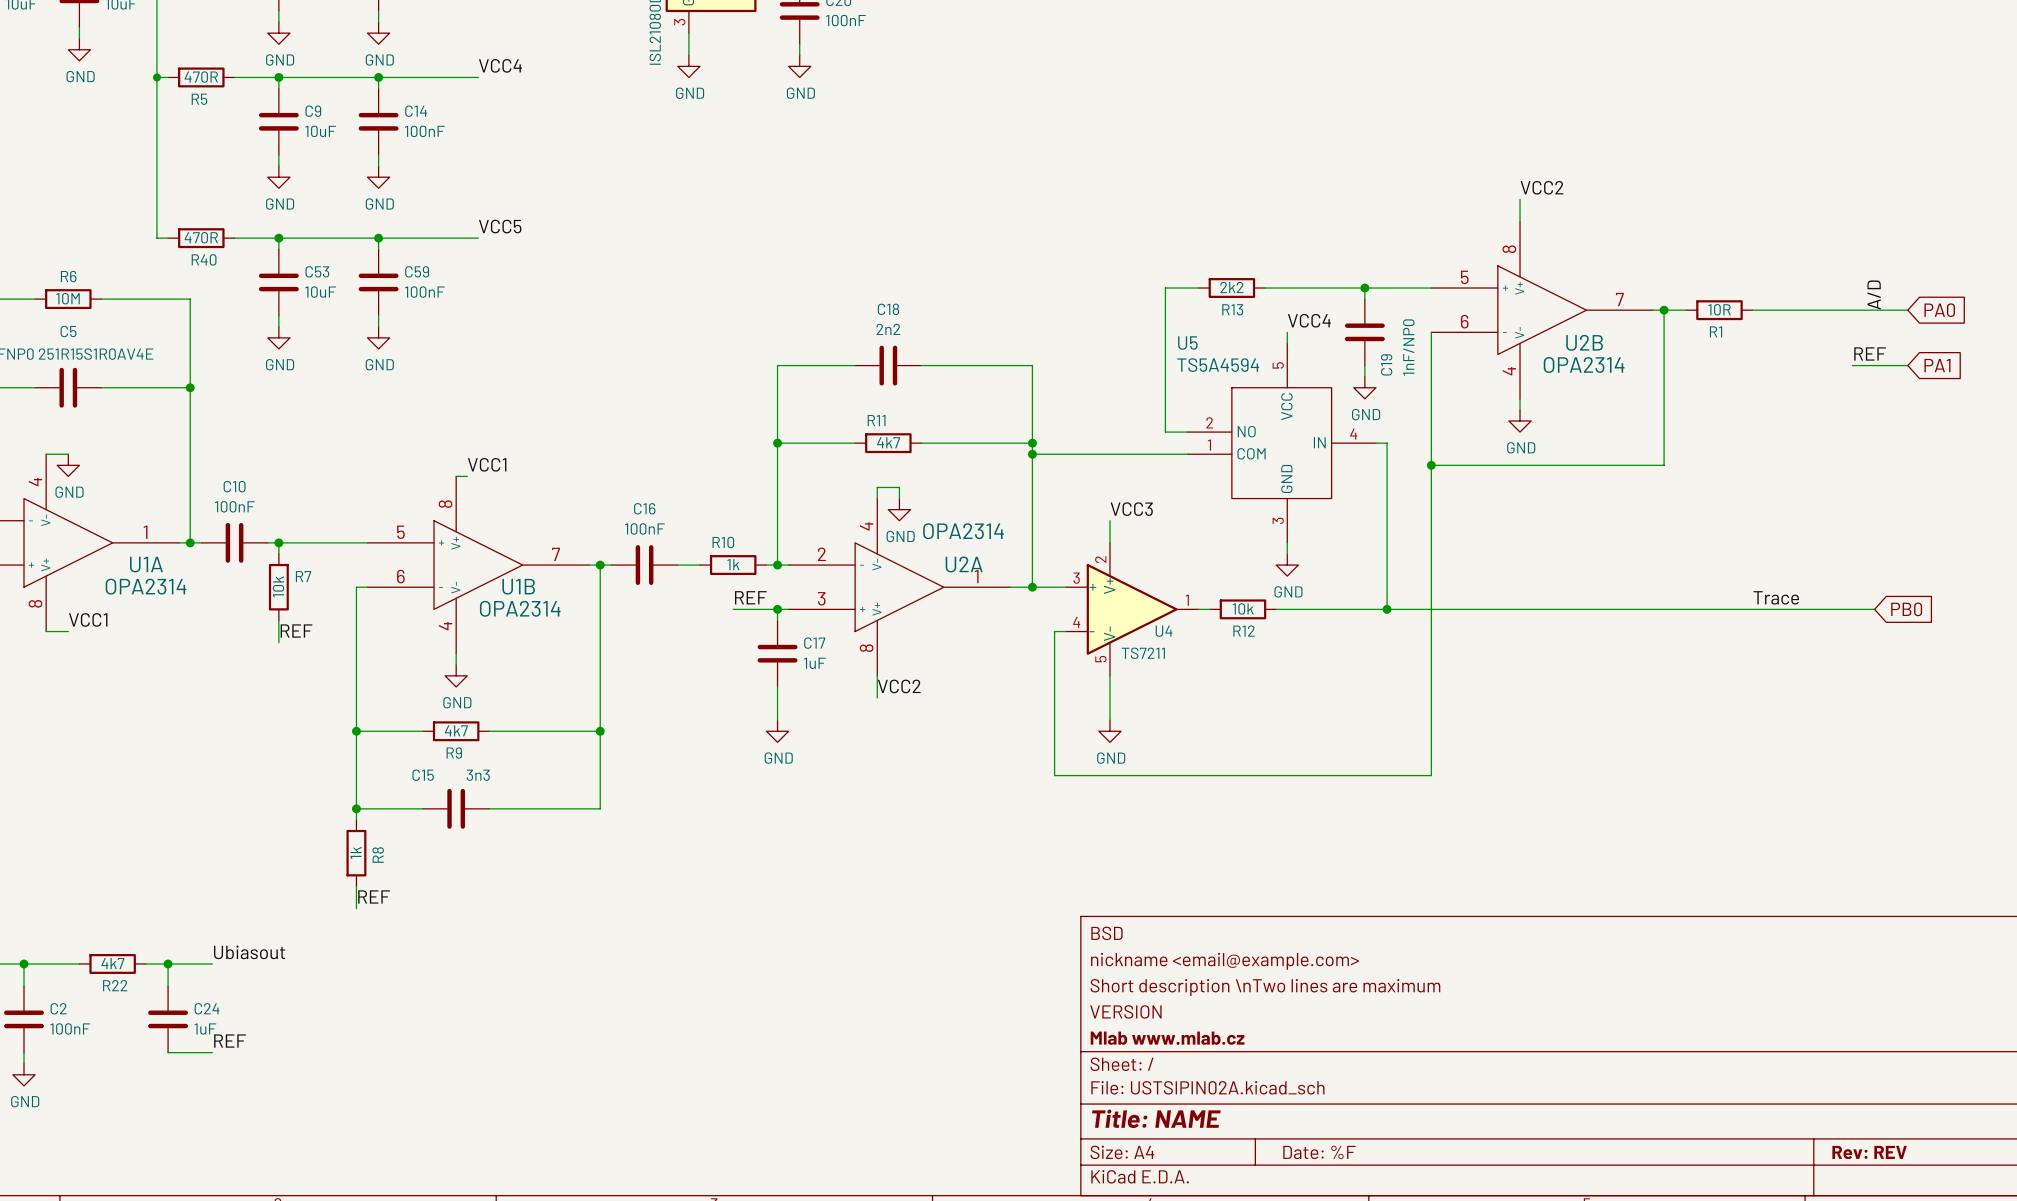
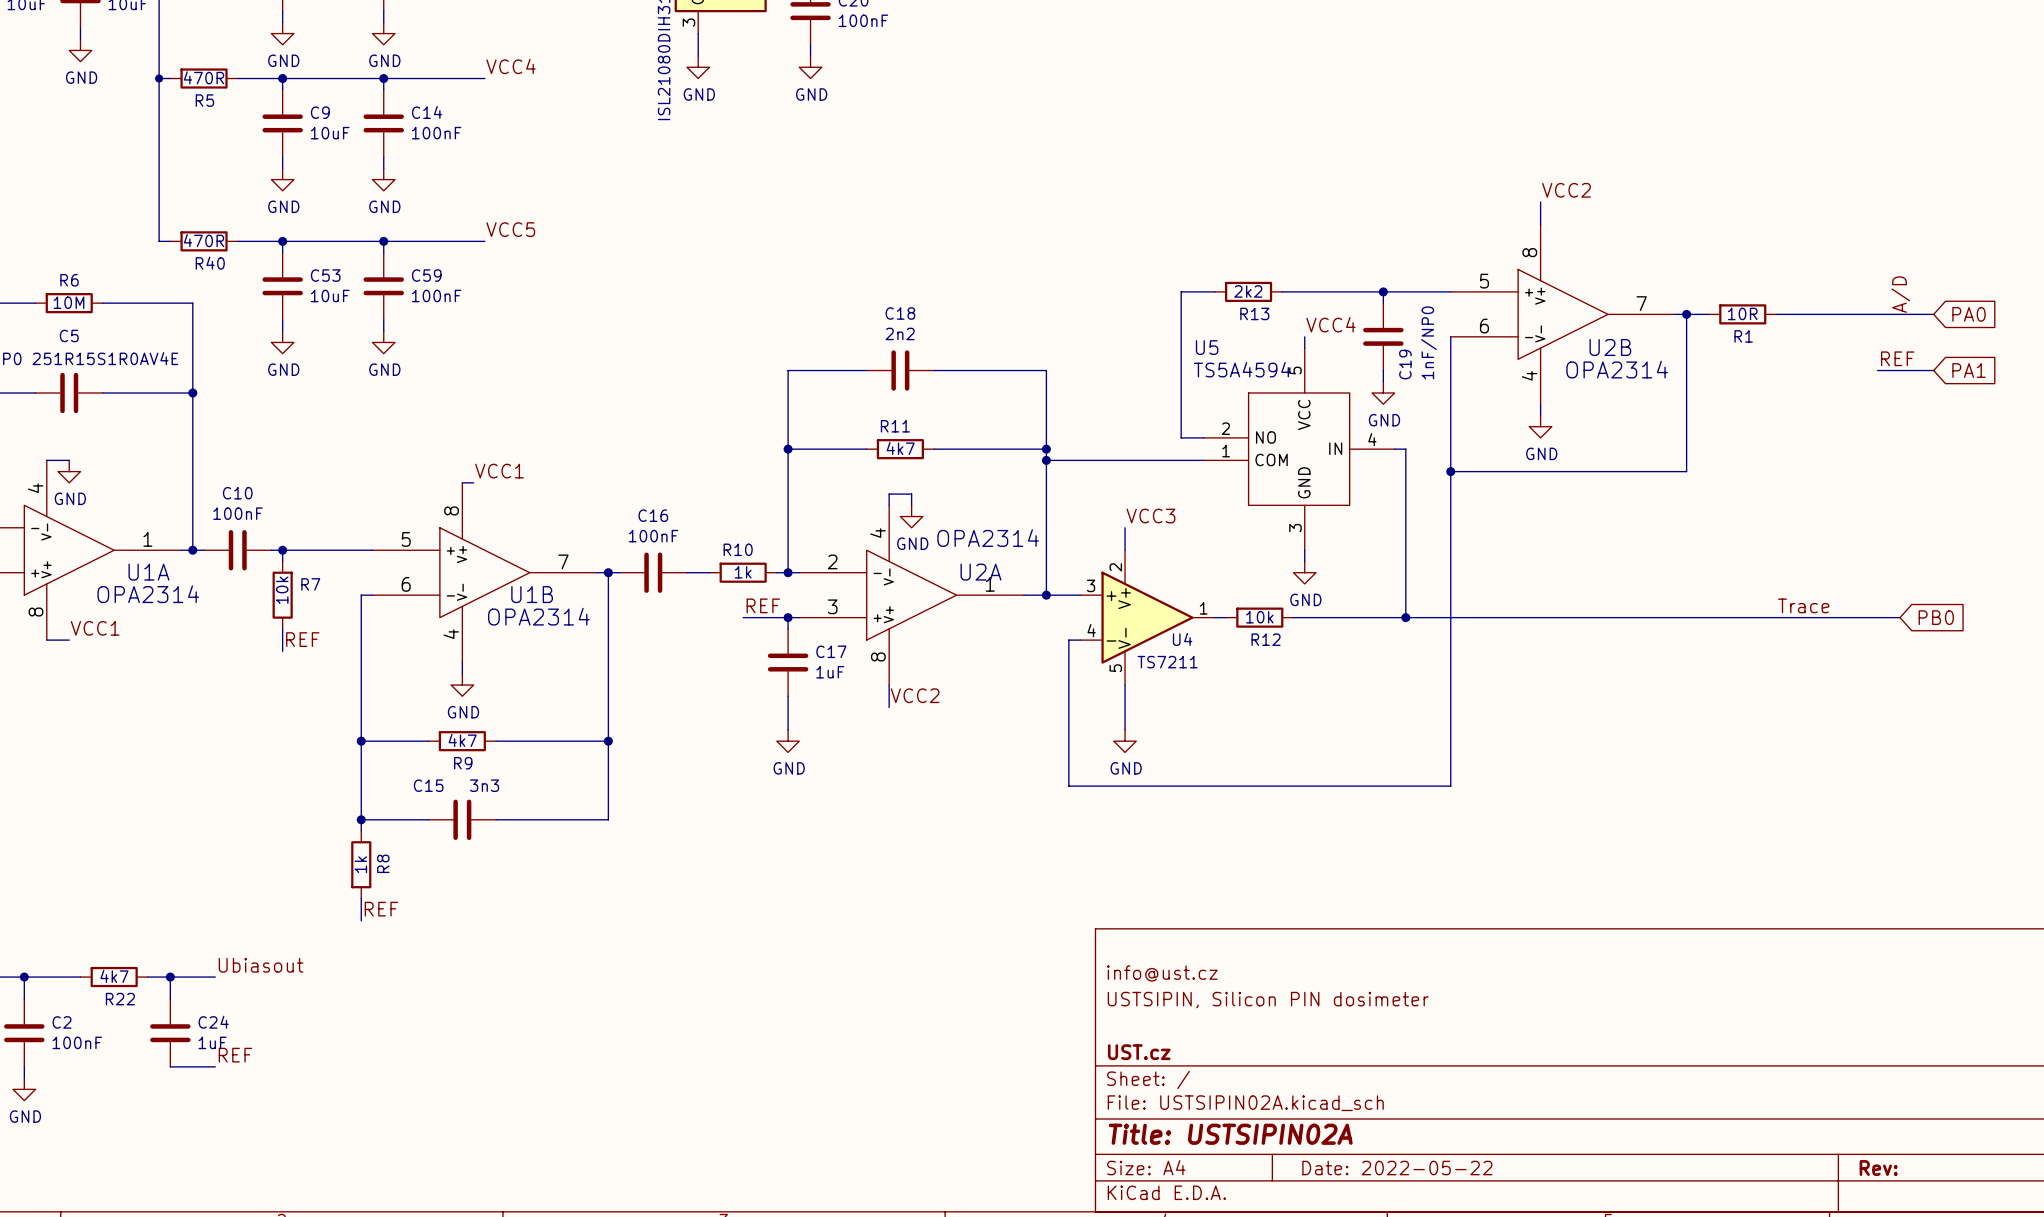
title block: BSD (1106, 933) -> none
title block: nickname <email@example.com> (1224, 961) -> info@ust.cz (1162, 973)
title block: Short description \nTwo lines are maximum (1265, 987) -> USTSIPIN, Silicon PIN dosimeter (1268, 1000)
title block: VERSION (1125, 1011) -> none
title block: Mlab www.mlab.cz (1167, 1038) -> UST.cz (1139, 1052)
title block: Title: NAME (1156, 1118) -> Title: USTSIPIN02A (1230, 1134)
title block: Date: %F (1319, 1152) -> Date: 2022-05-22 (1397, 1168)
title block: Rev: REV (1869, 1152) -> Rev: (1878, 1168)

